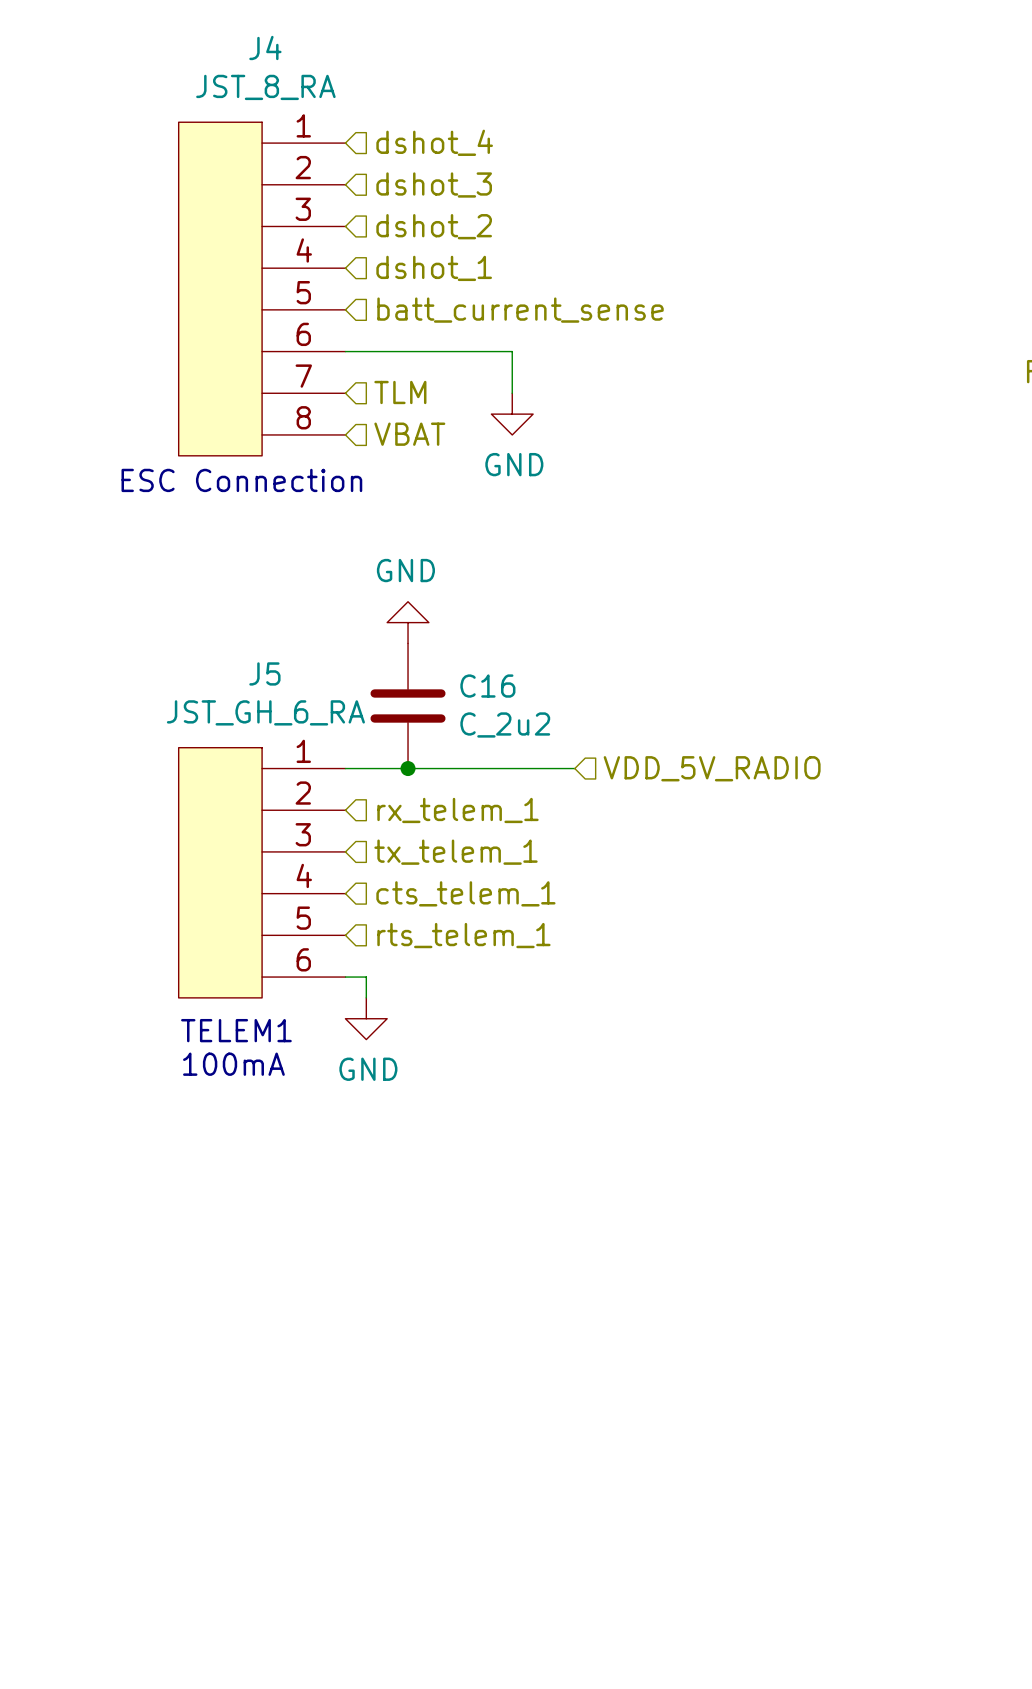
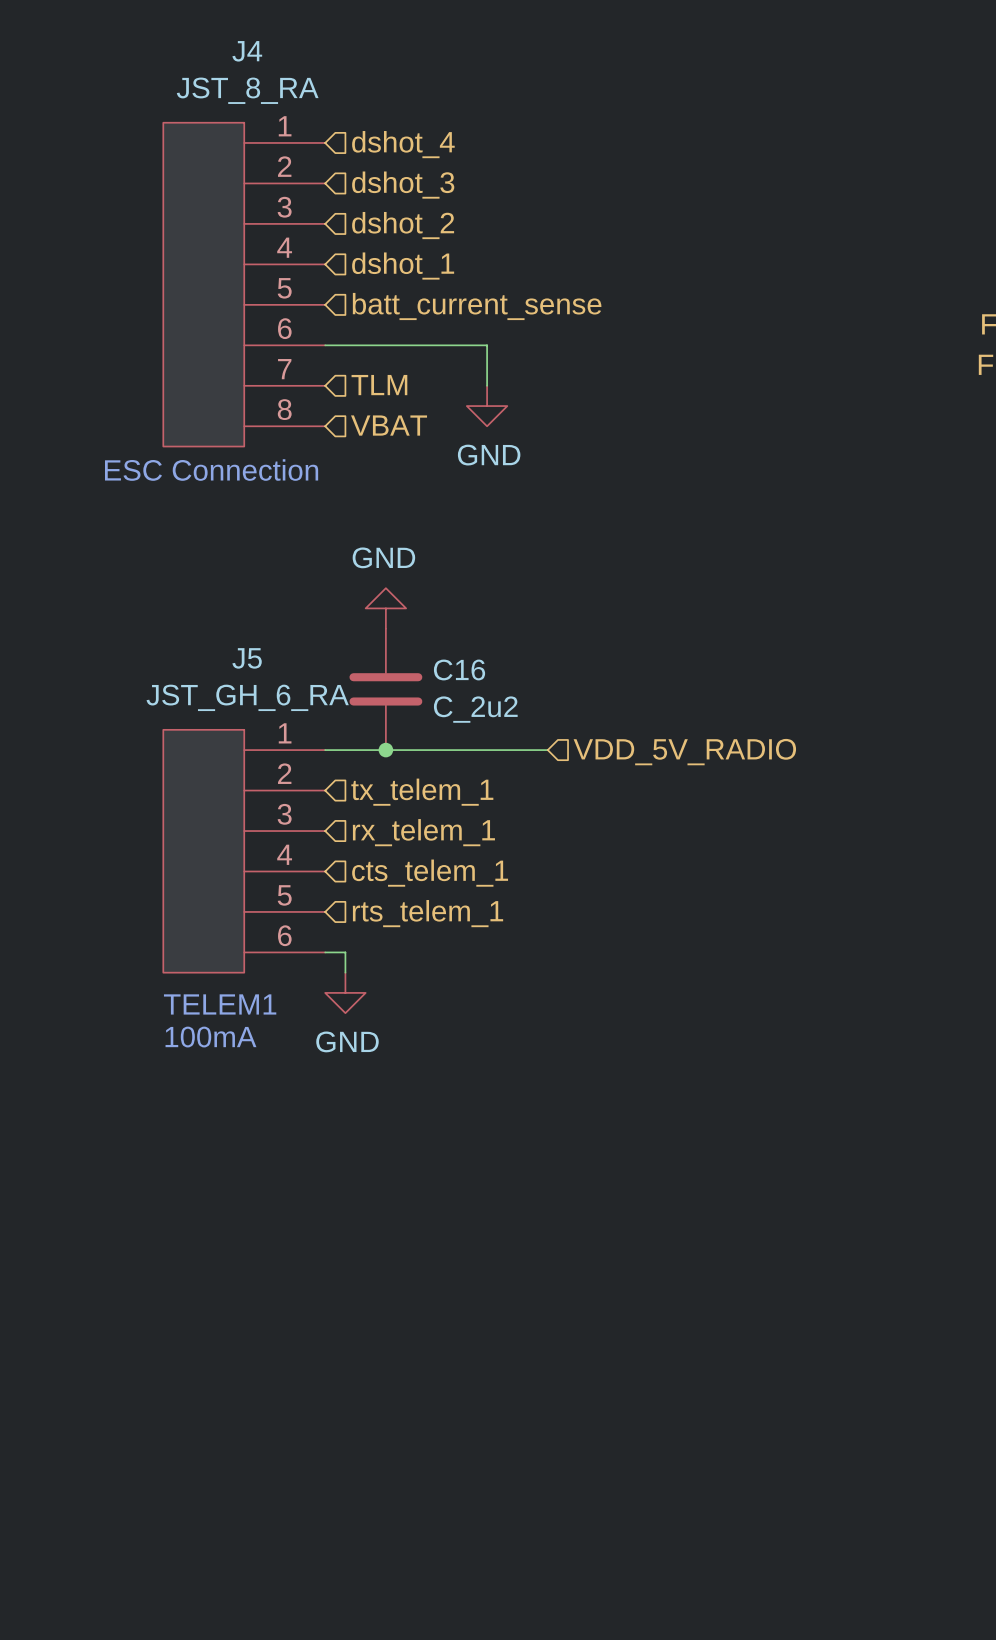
hierarchical label: rx_telem_1 (457, 810) -> tx_telem_1 (422, 792)
hierarchical label: tx_telem_1 (455, 852) -> rx_telem_1 (423, 832)

